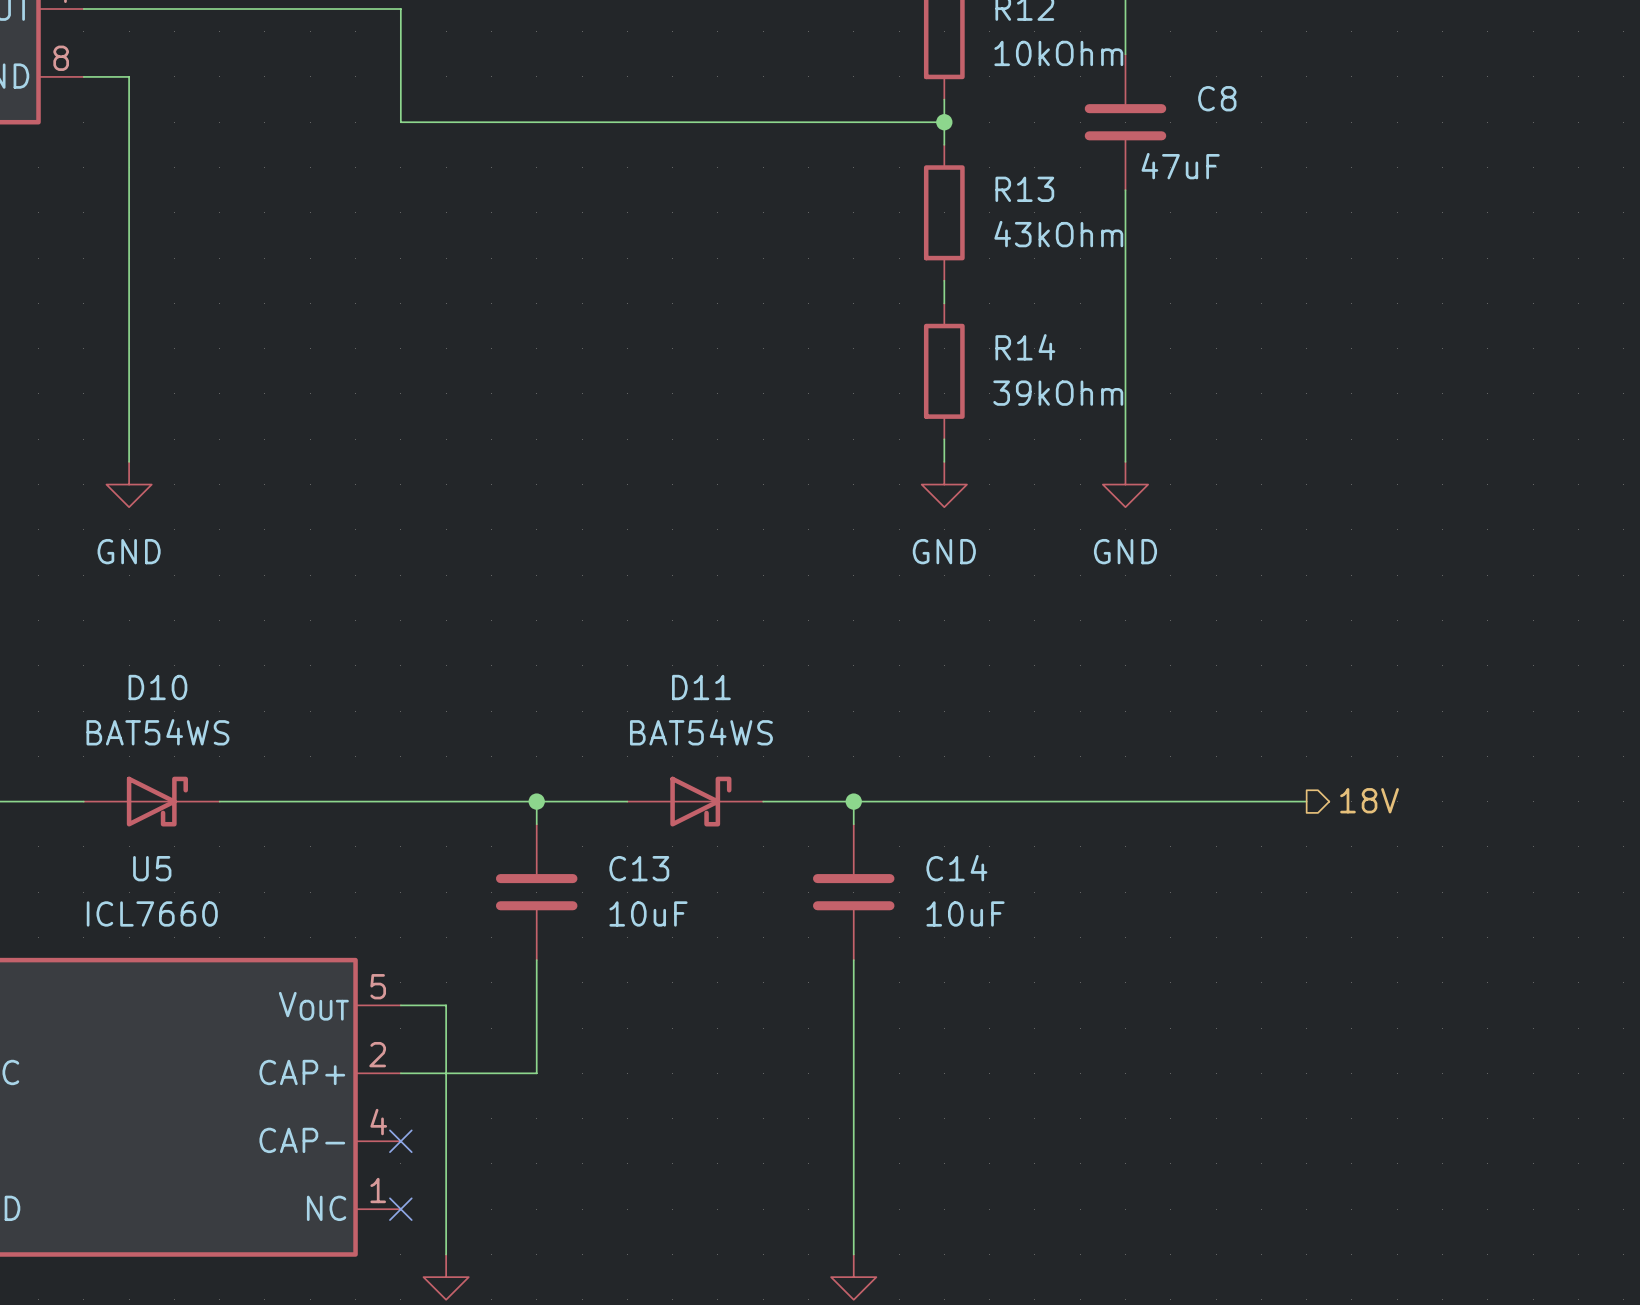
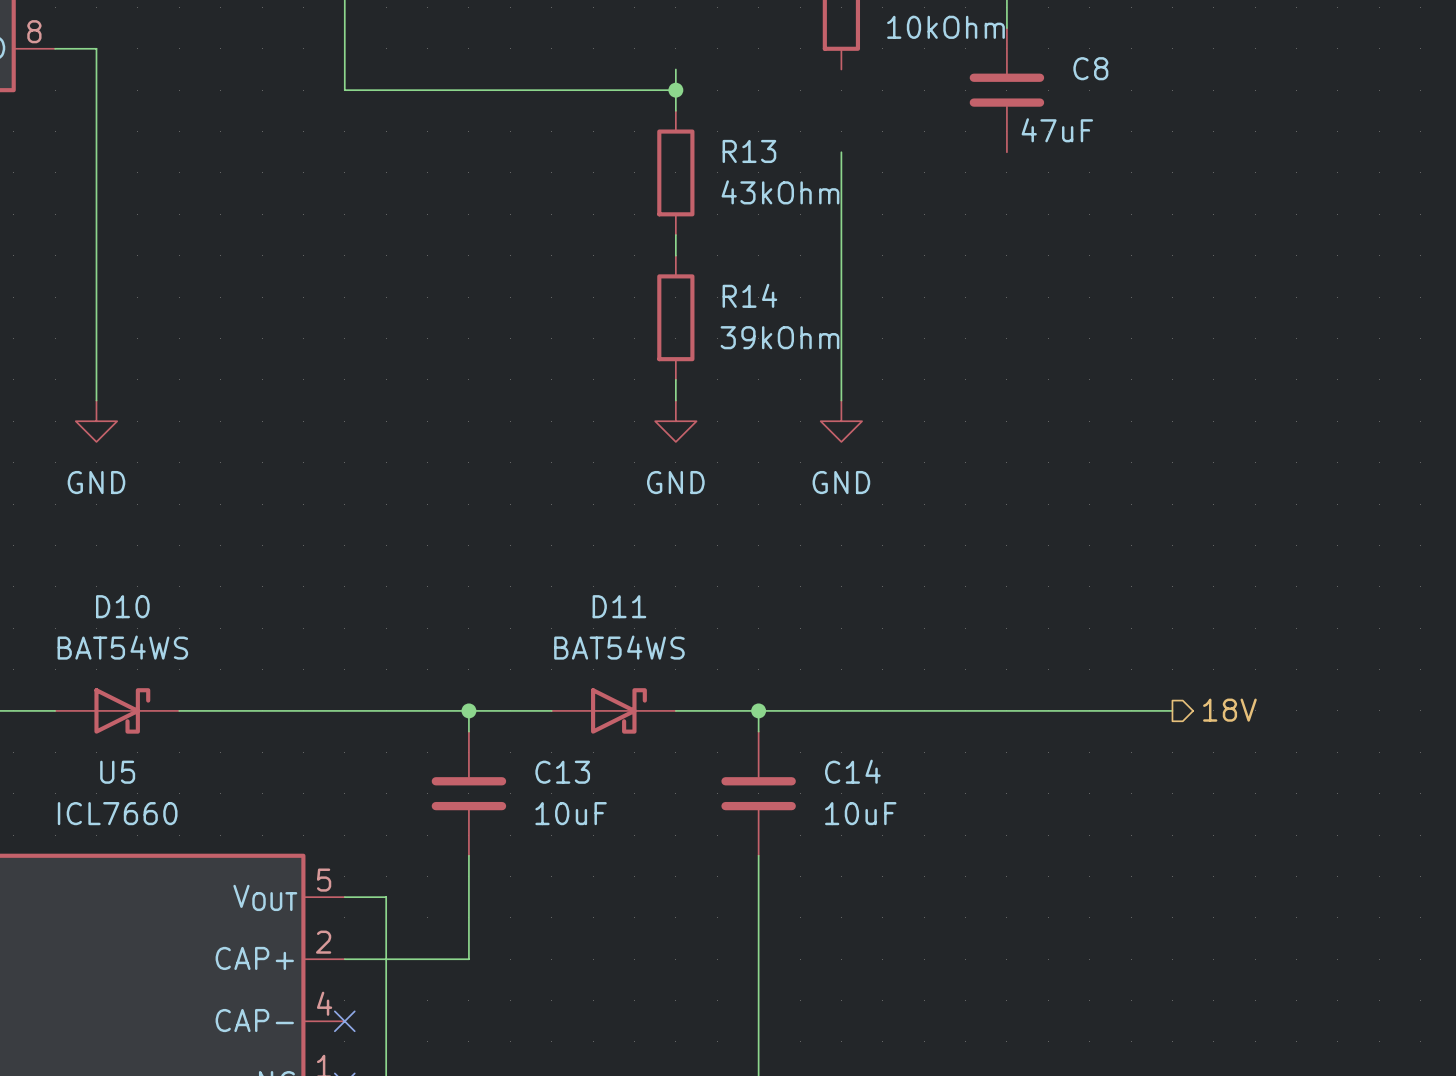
wire: (944, 99) (944, 144) -> (675, 69) (675, 110)
wire: (763, 122) (944, 122) -> none
junction: none -> (675, 90)
junction: (944, 122) -> none
wire: none -> (841, 152) (841, 235)
wire: (1125, 190) (1125, 461) -> none
R13 position: (944, 212) -> (675, 172)
wire: none -> (675, 235) (675, 255)
wire: none -> (841, 255) (841, 379)
R14 position: (944, 371) -> (675, 317)
wire: none -> (675, 379) (675, 400)
power symbol position: GND (1125, 484) -> GND (675, 421)

